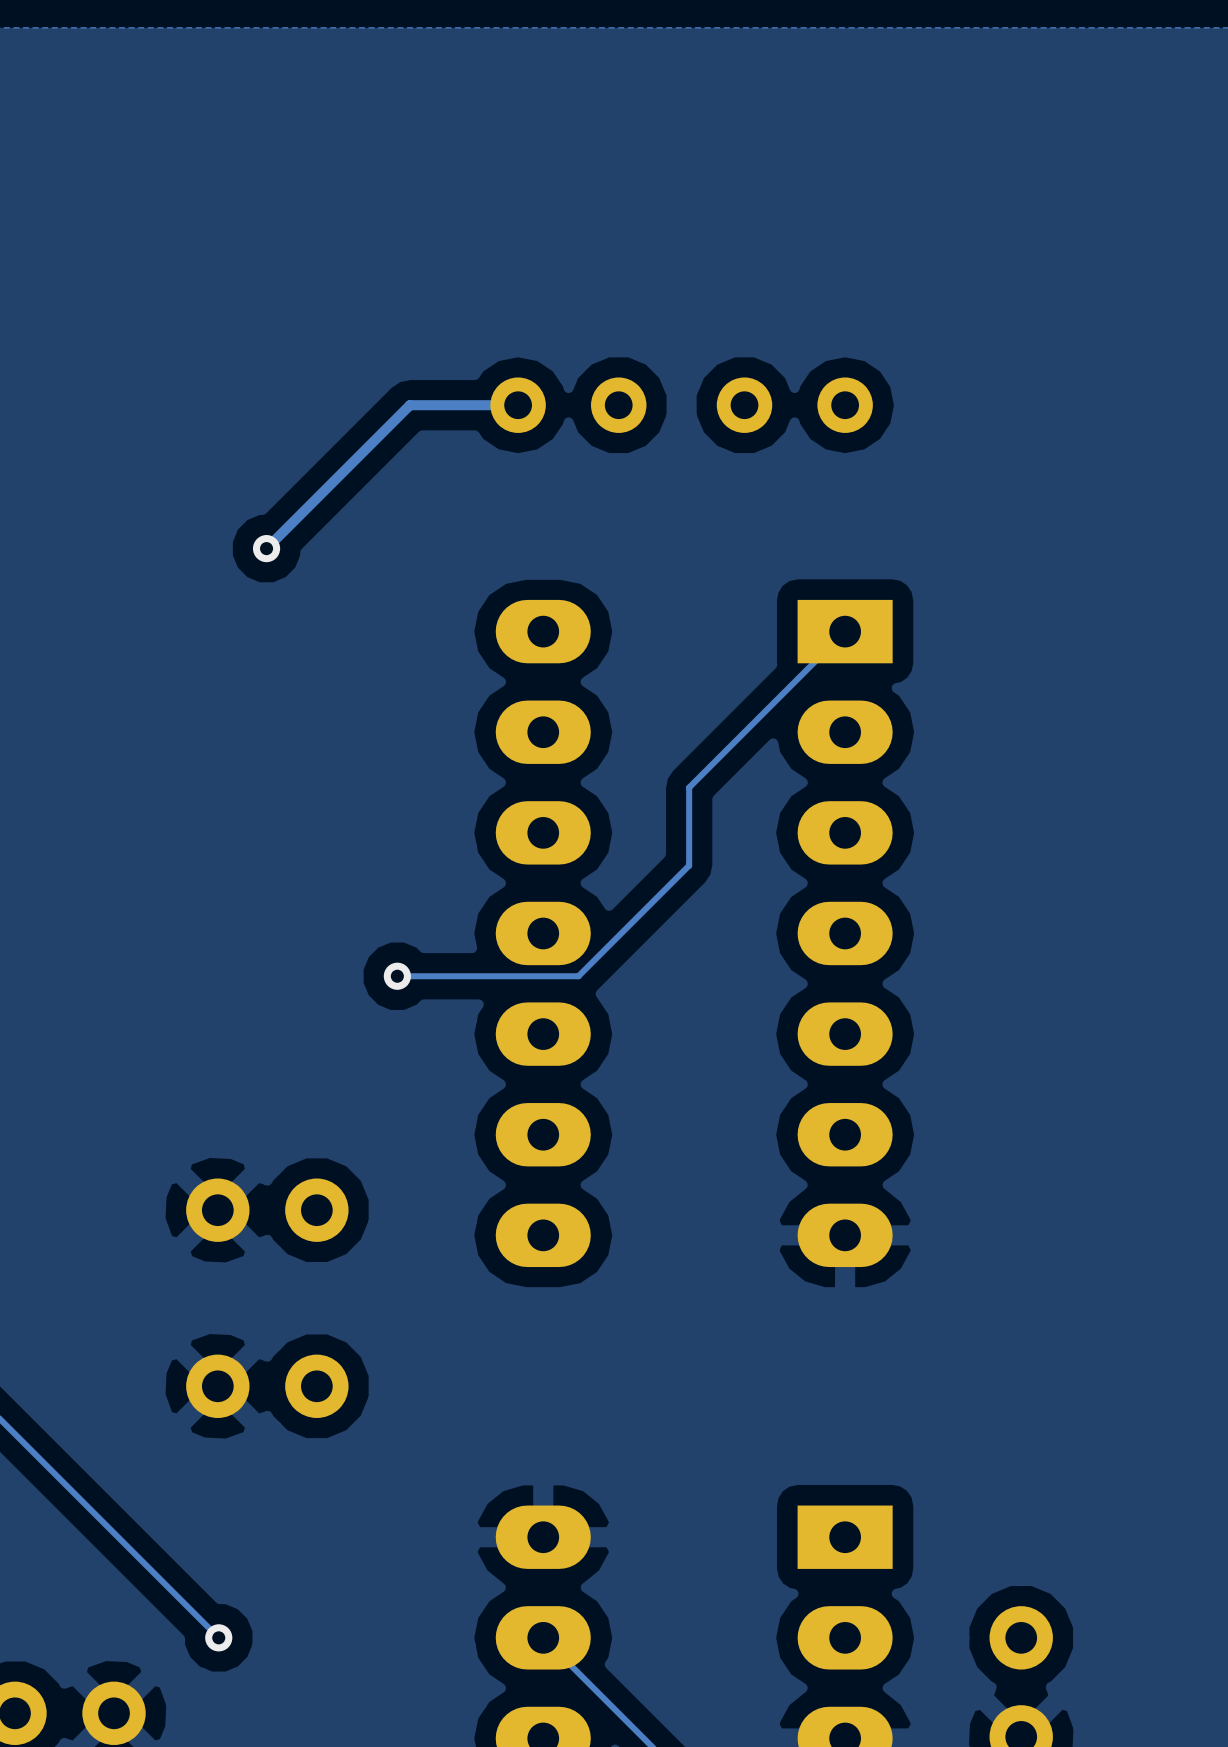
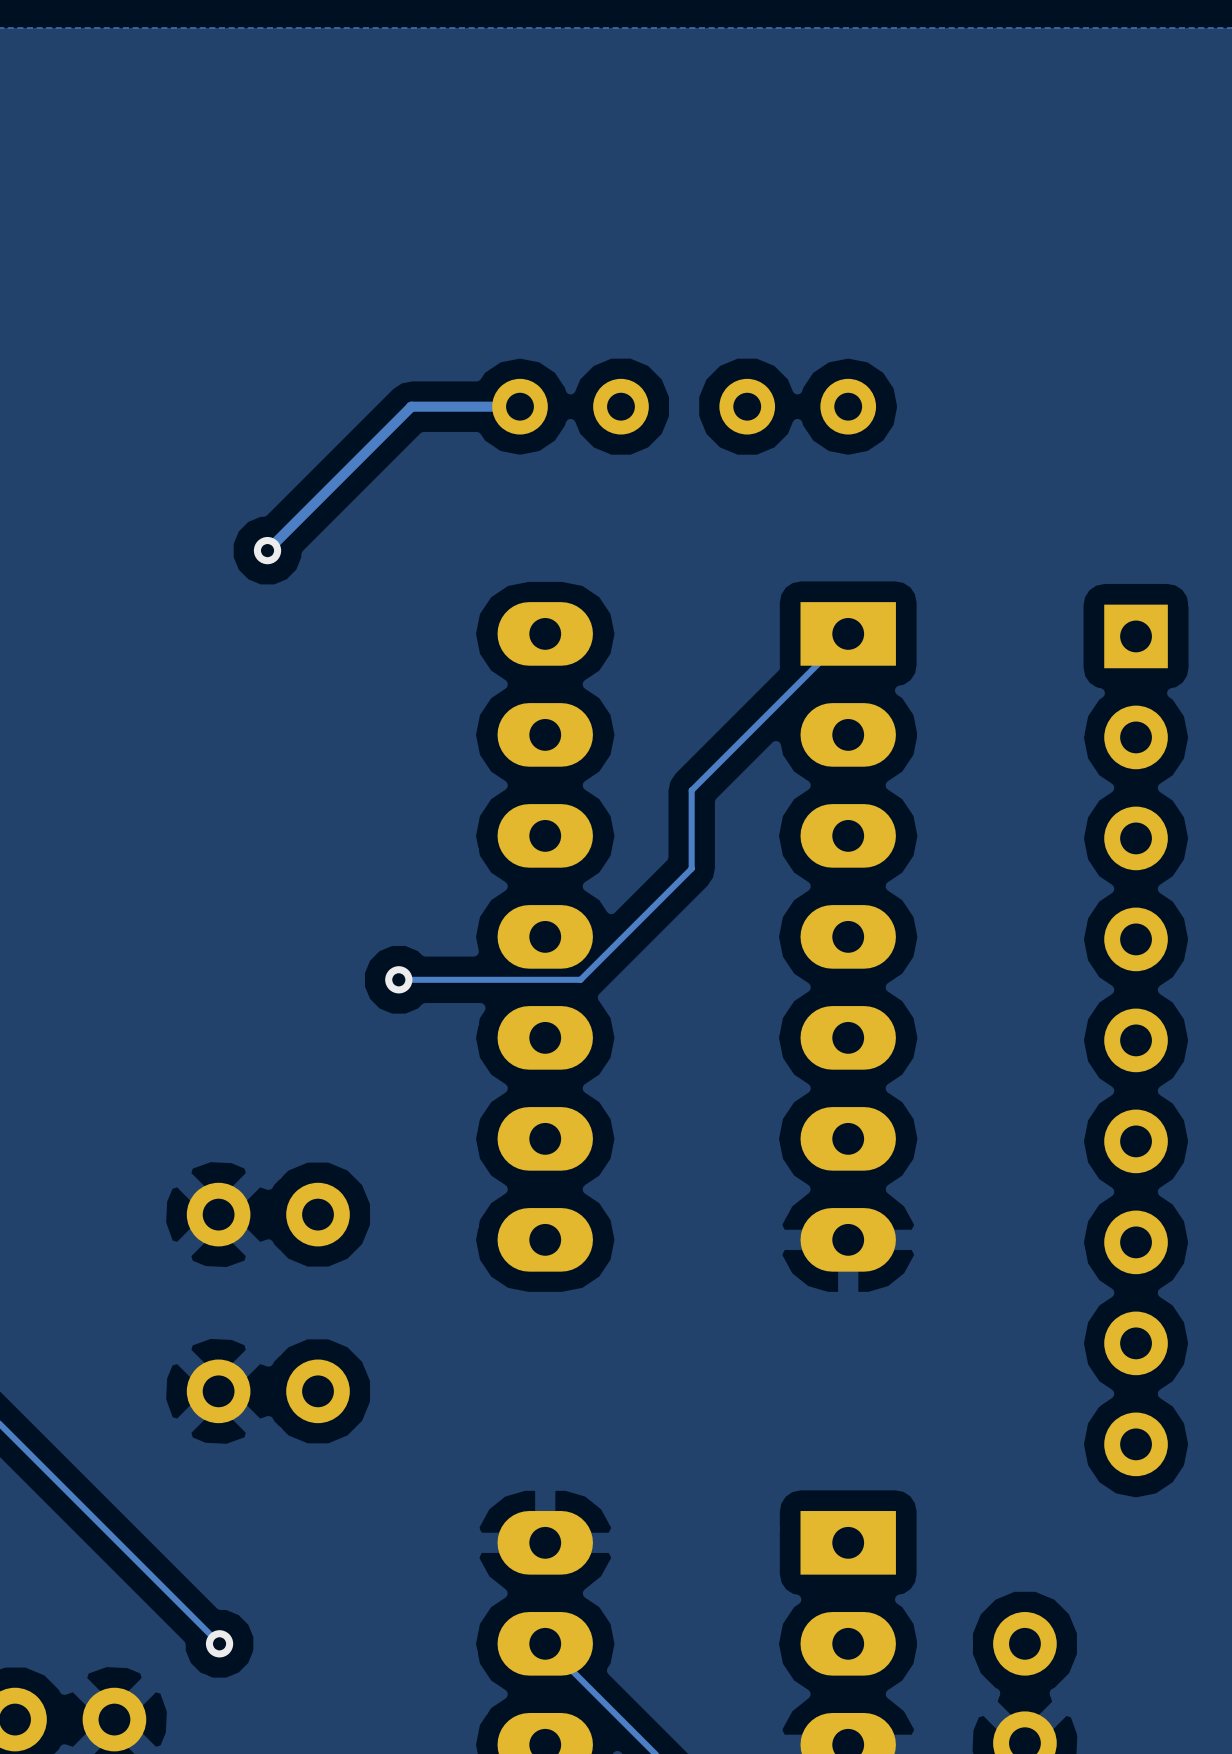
part: none -> (1136, 1040)

